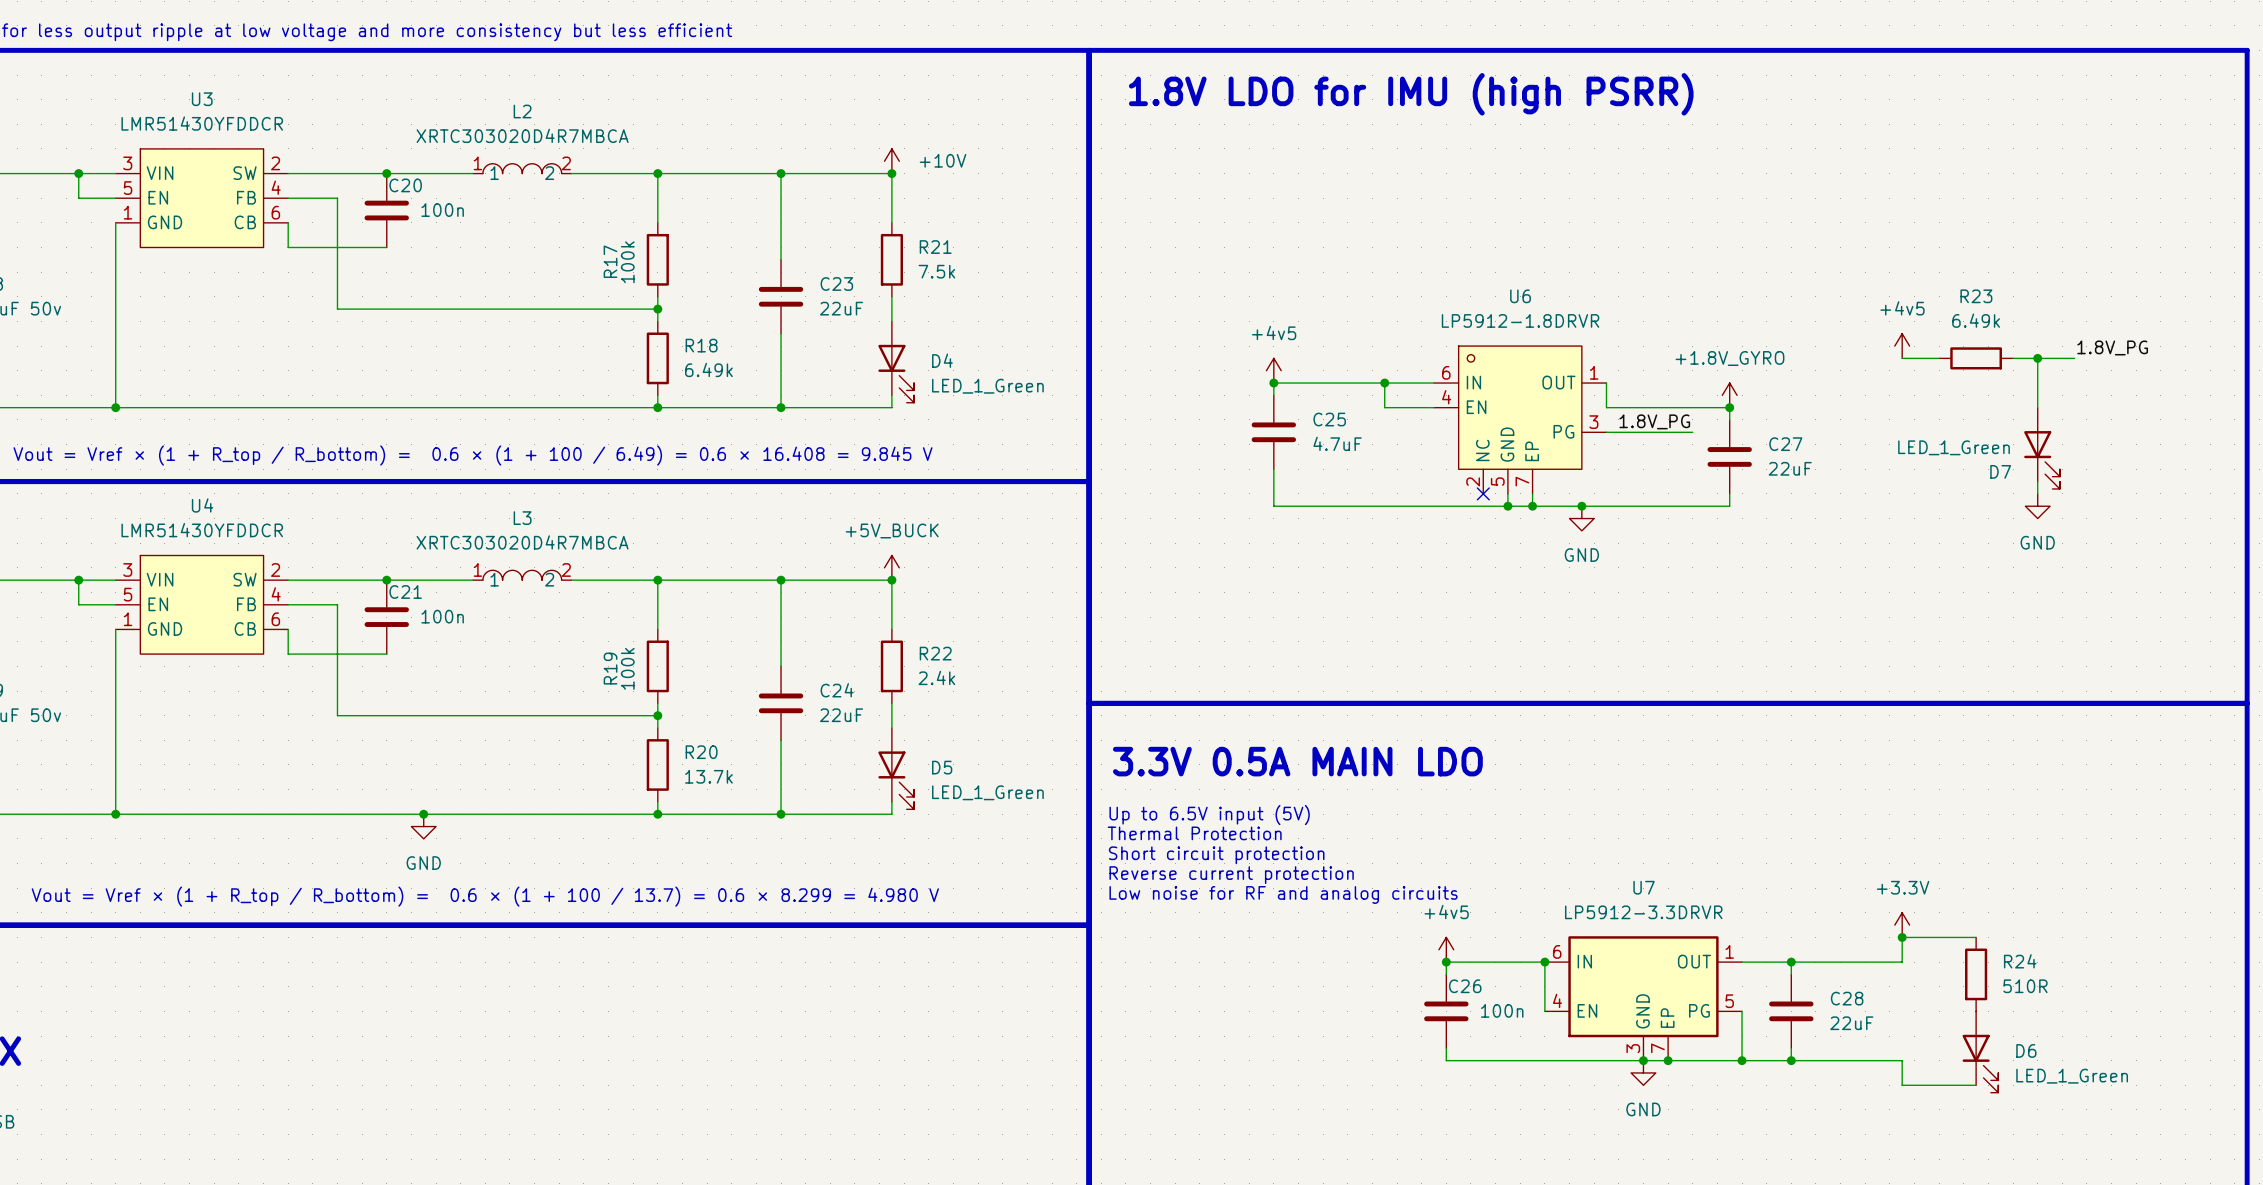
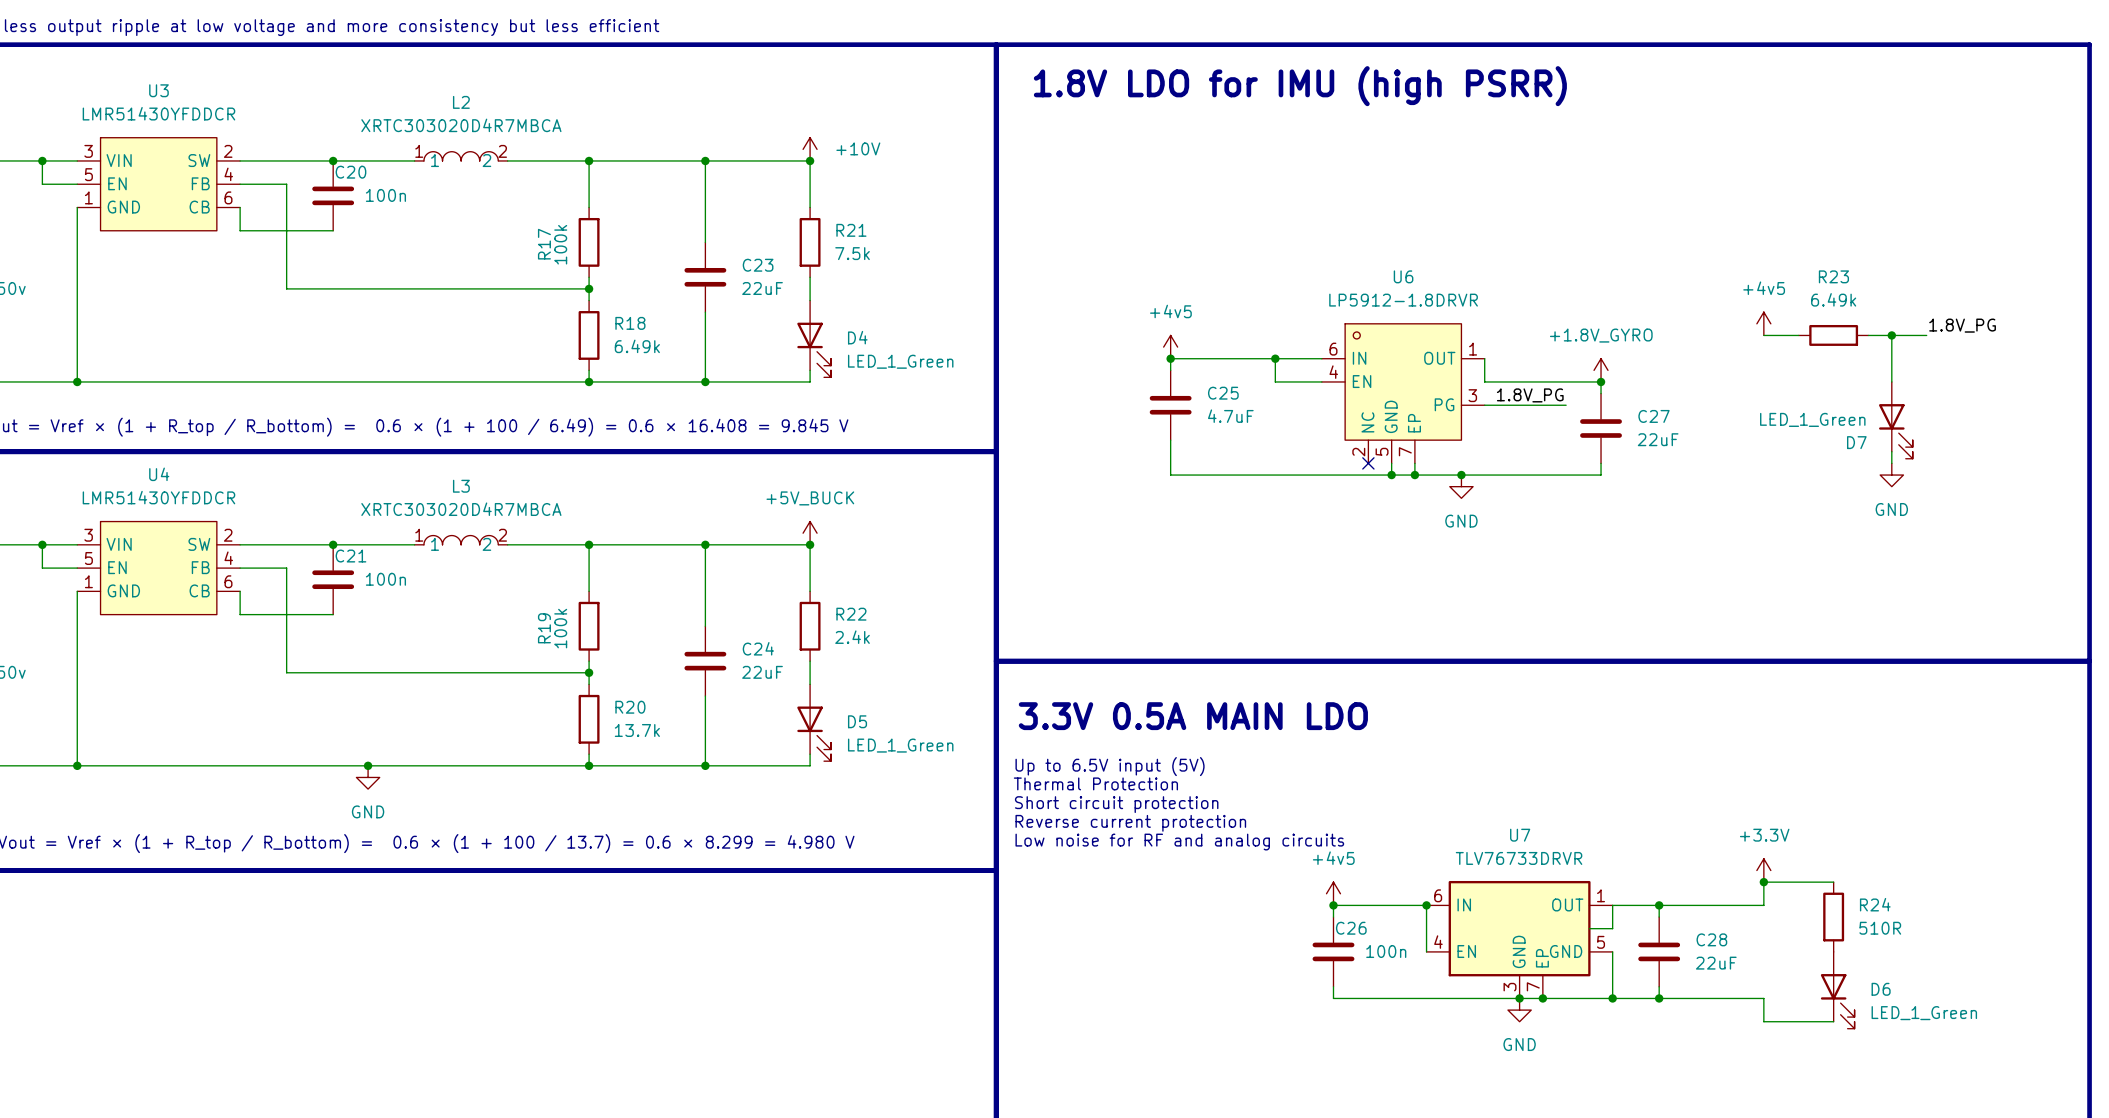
U7 value: LP5912-3.3DRVR (1643, 912) -> TLV76733DRVR (1519, 858)
wire: none -> (1612, 905) (1612, 928) (1589, 928)
U7 pin name: PG (1699, 1010) -> GND (1566, 951)

